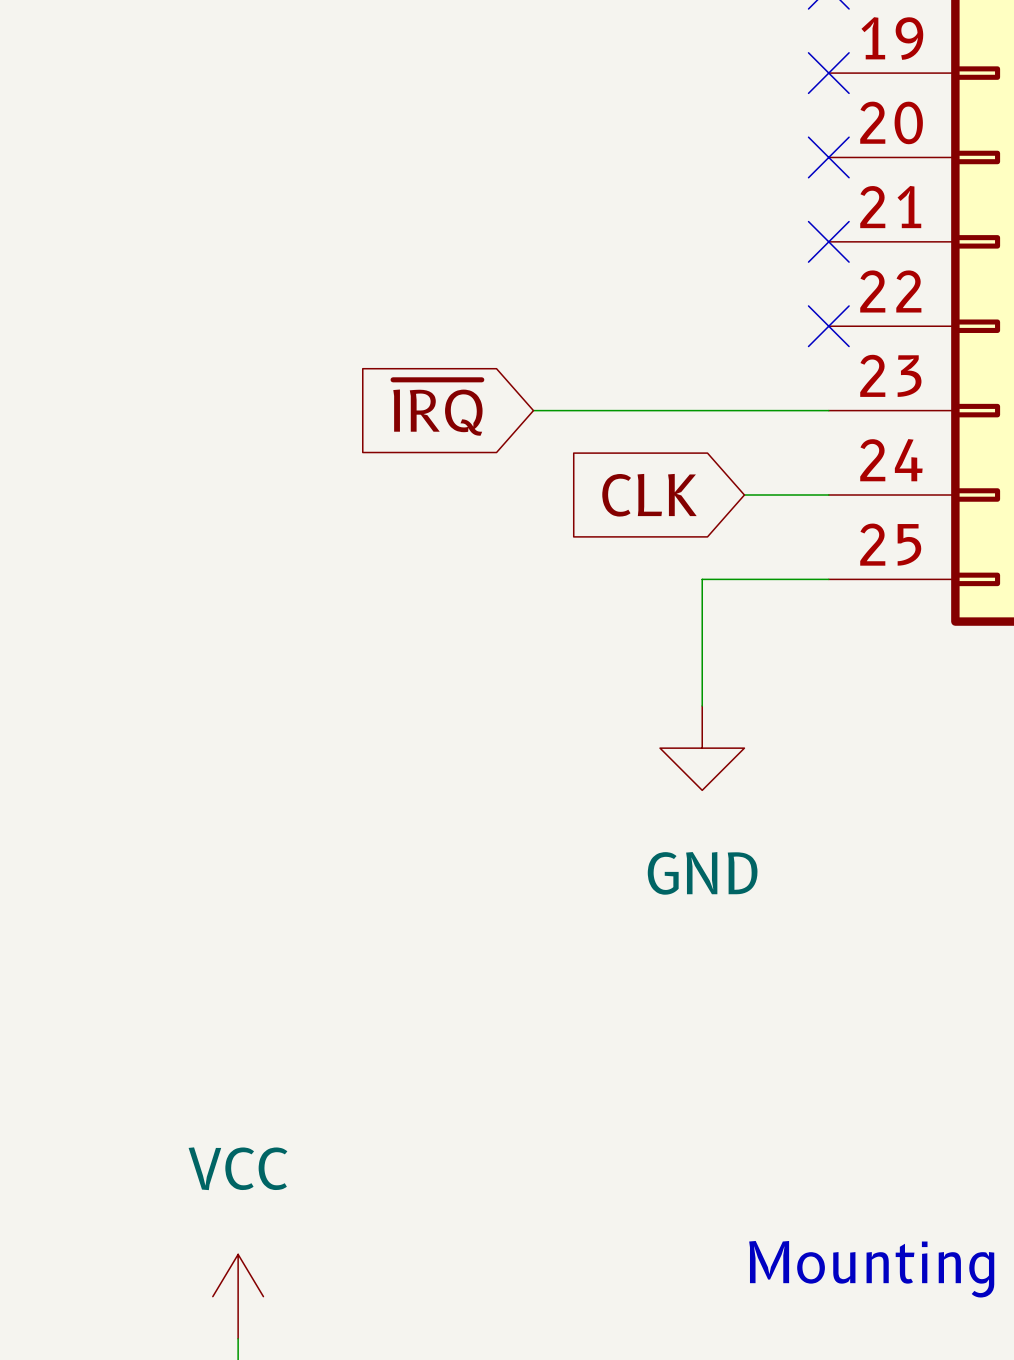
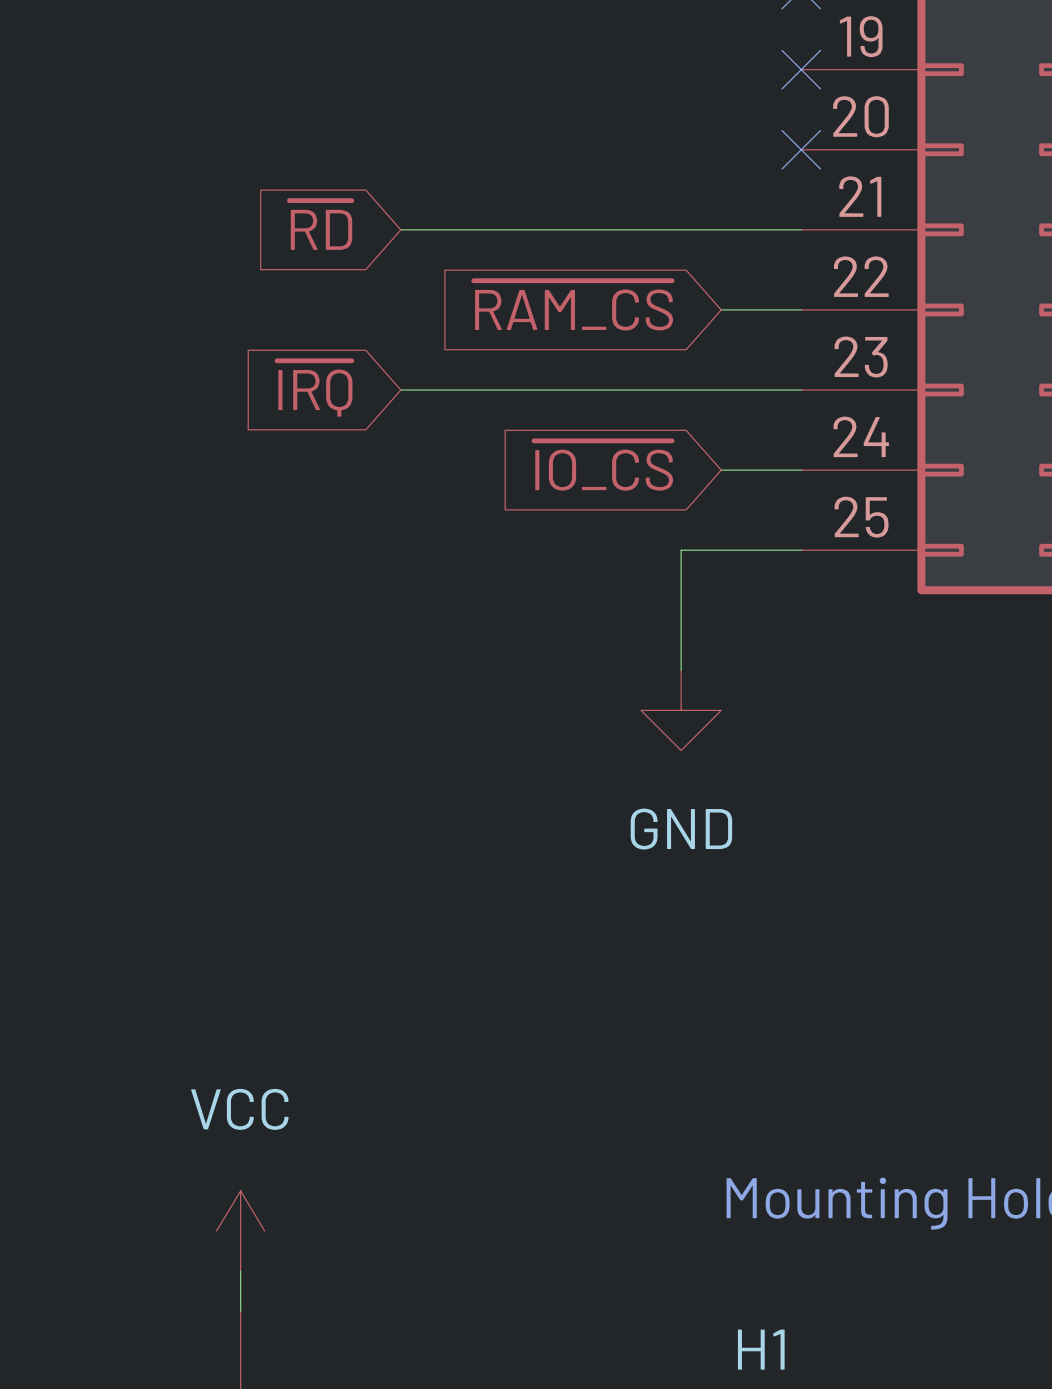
global label: none -> ~{RD} (320, 225)
wire: none -> (400, 229) (801, 229)
no-connect mark: (828, 241) -> none
wire: none -> (721, 309) (801, 309)
no-connect mark: (828, 326) -> none
global label: none -> ~{RAM_CS} (573, 305)
global label position: ~{IRQ} (437, 407) -> ~{IRQ} (314, 388)
wire: none -> (400, 390) (520, 390)
global label: CLK (649, 495) -> ~{IO_CS} (603, 465)

